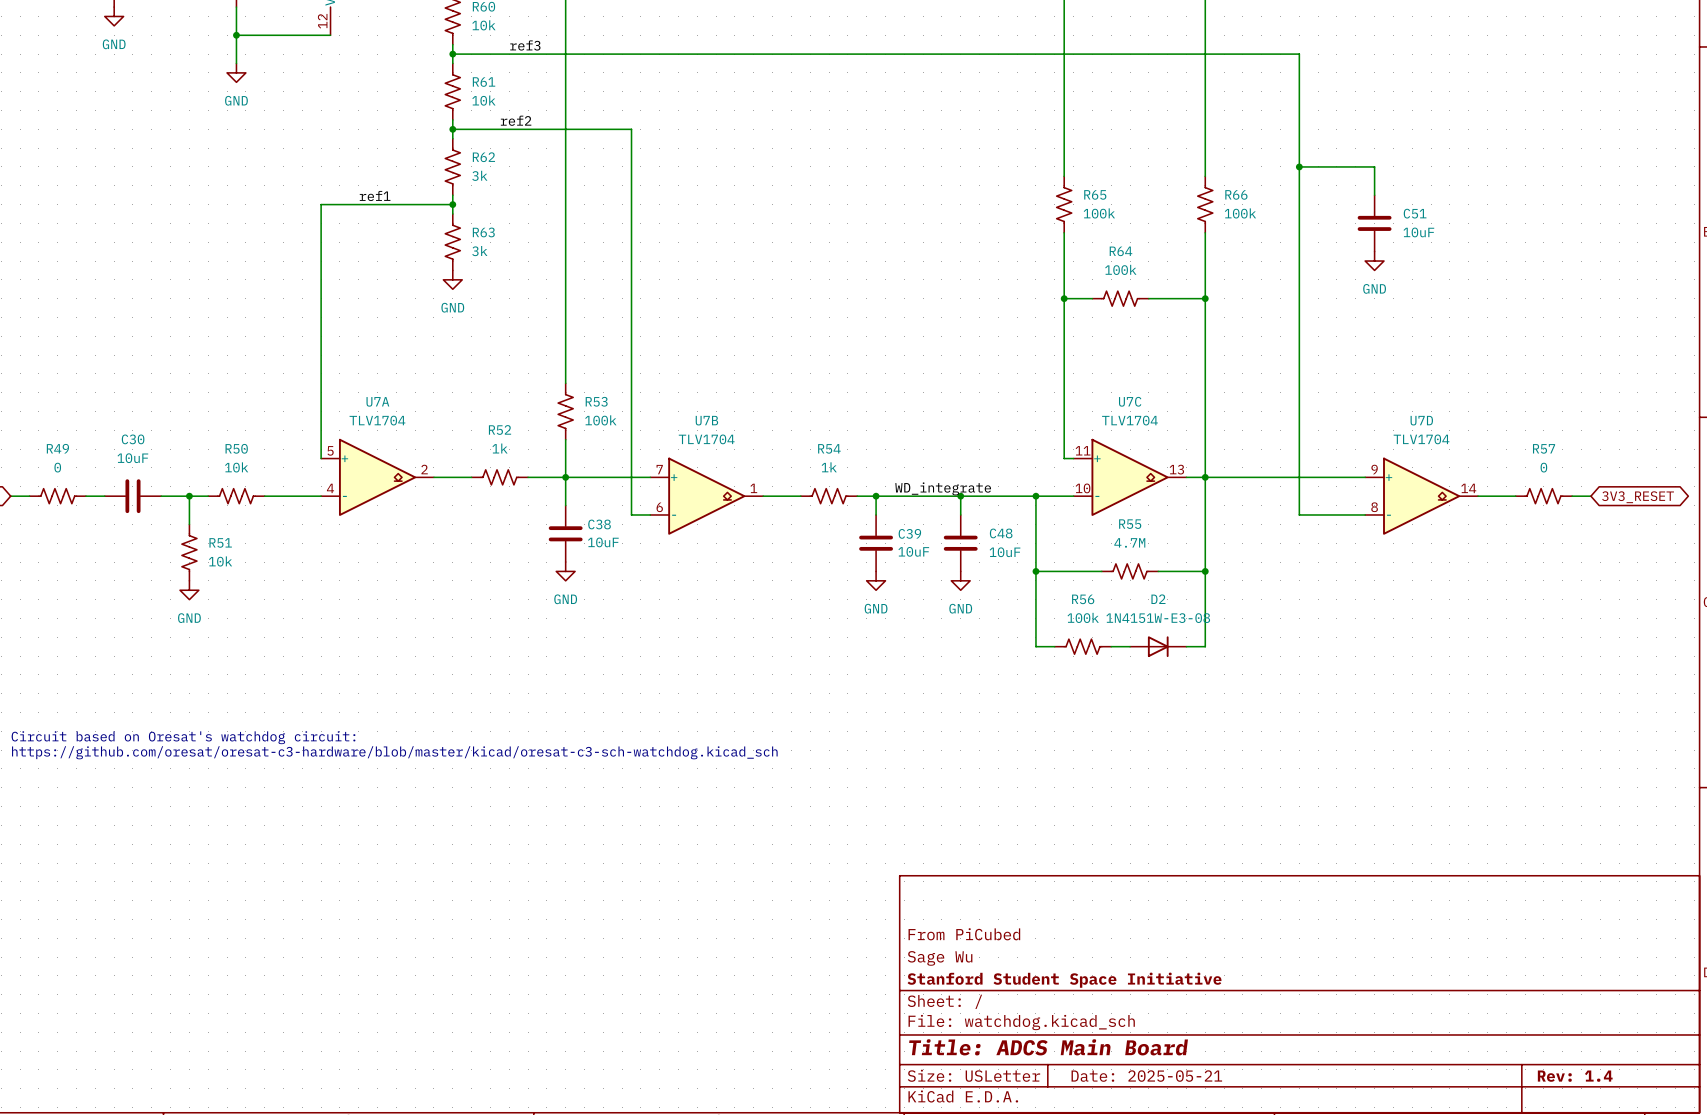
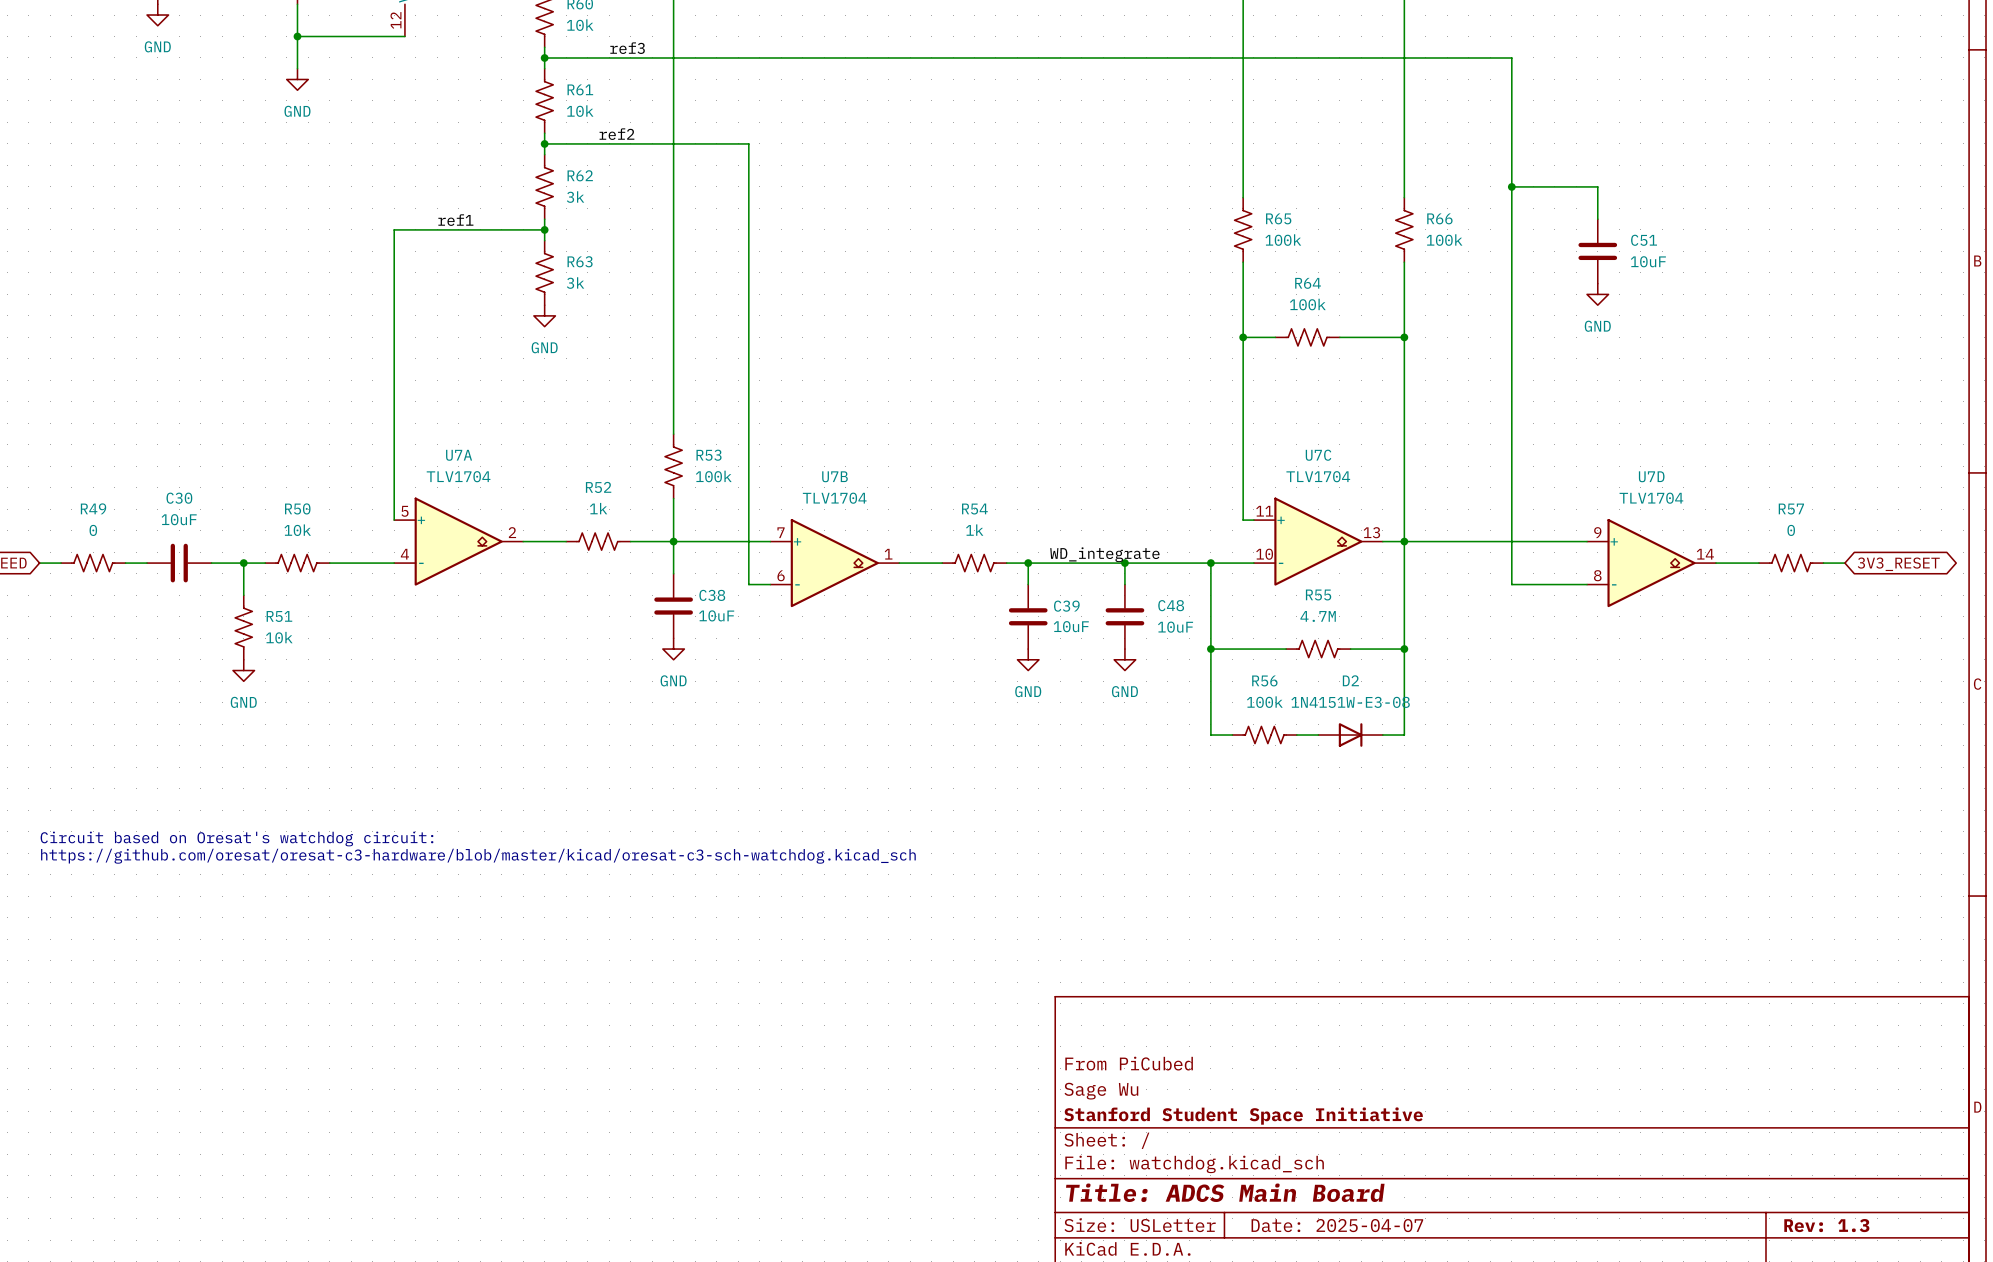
title block: Date: 2025-05-21 (1146, 1076) -> Date: 2025-04-07 (1337, 1225)
title block: Rev: 1.4 (1575, 1076) -> Rev: 1.3 (1826, 1225)

